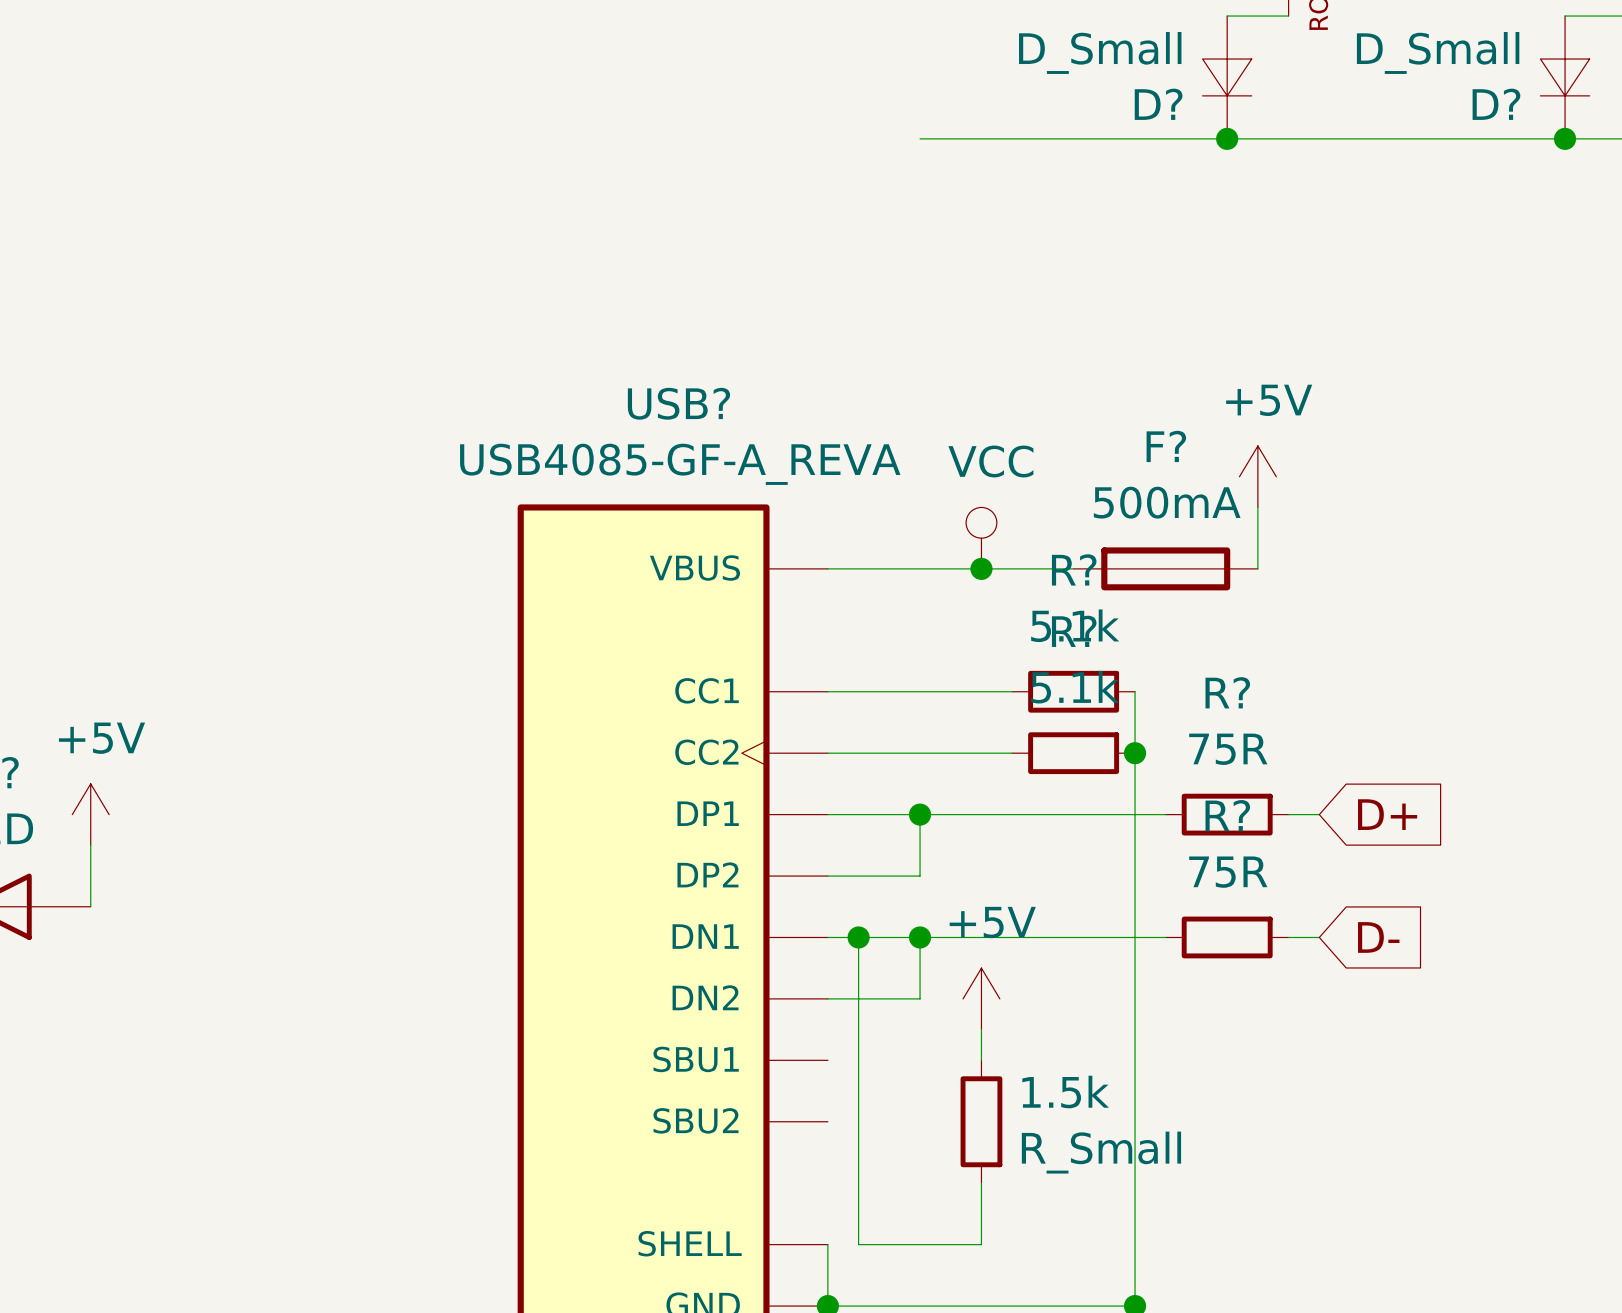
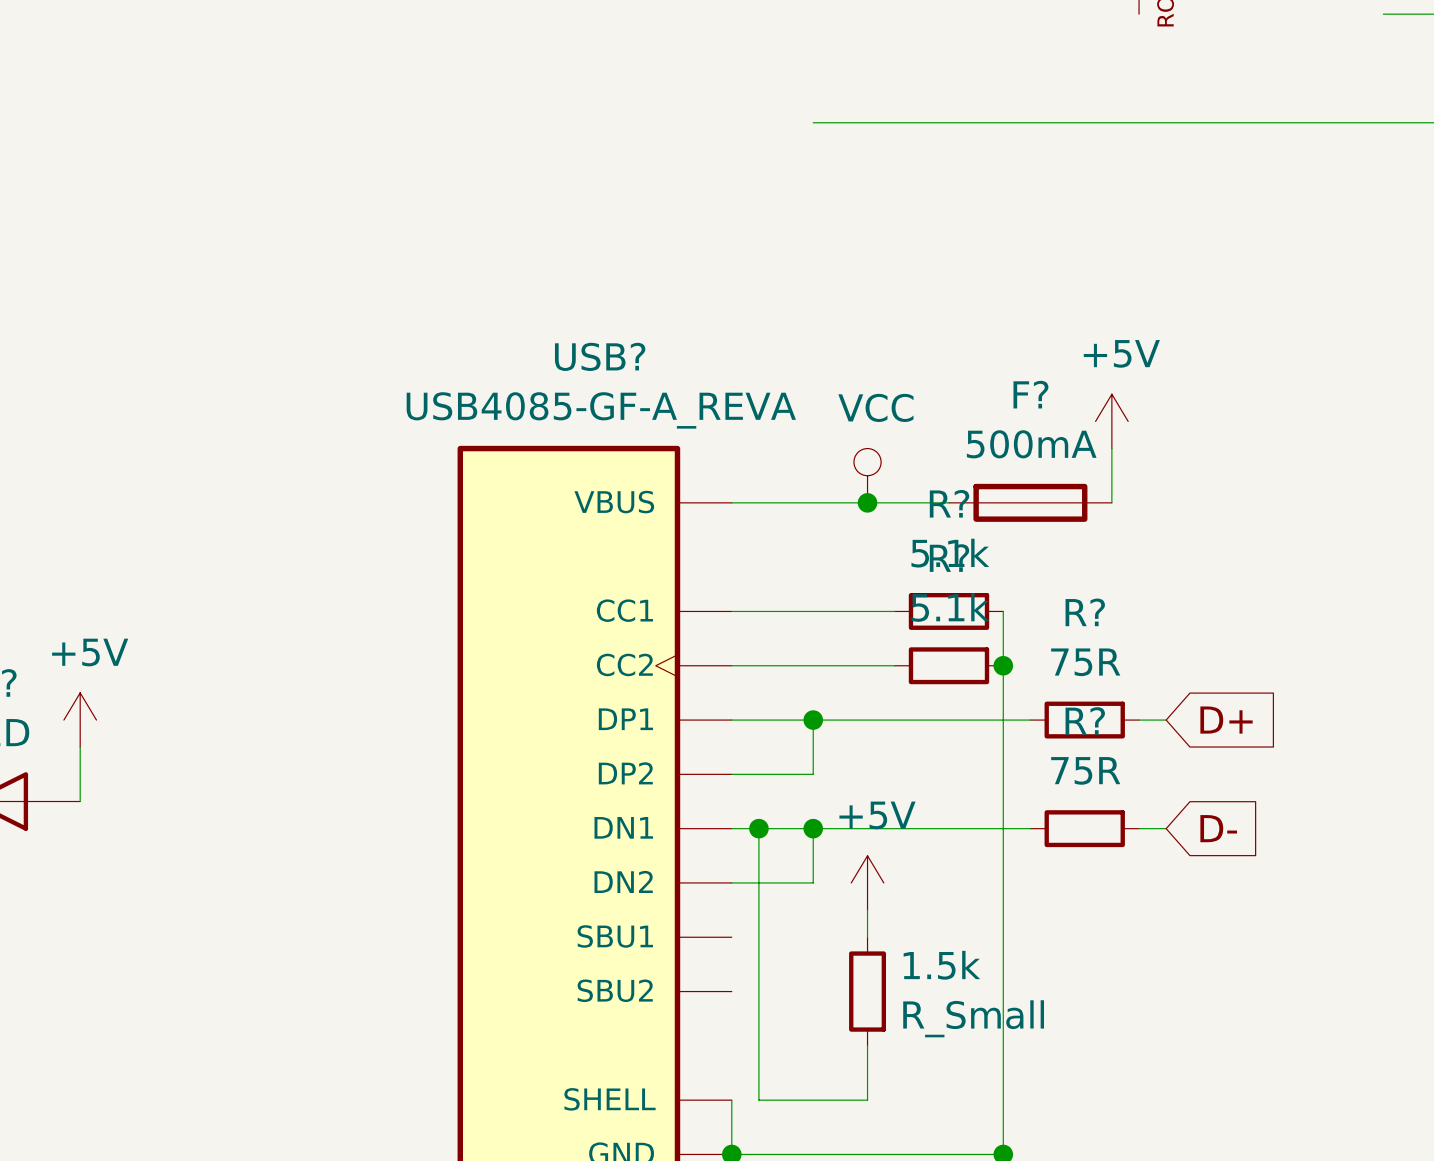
wire: (1227, 16) (1288, 16) -> none
D?: D_Small (1227, 77) -> none
D?: D_Small (1565, 77) -> none
junction: (1227, 138) -> none
junction: (1565, 138) -> none

